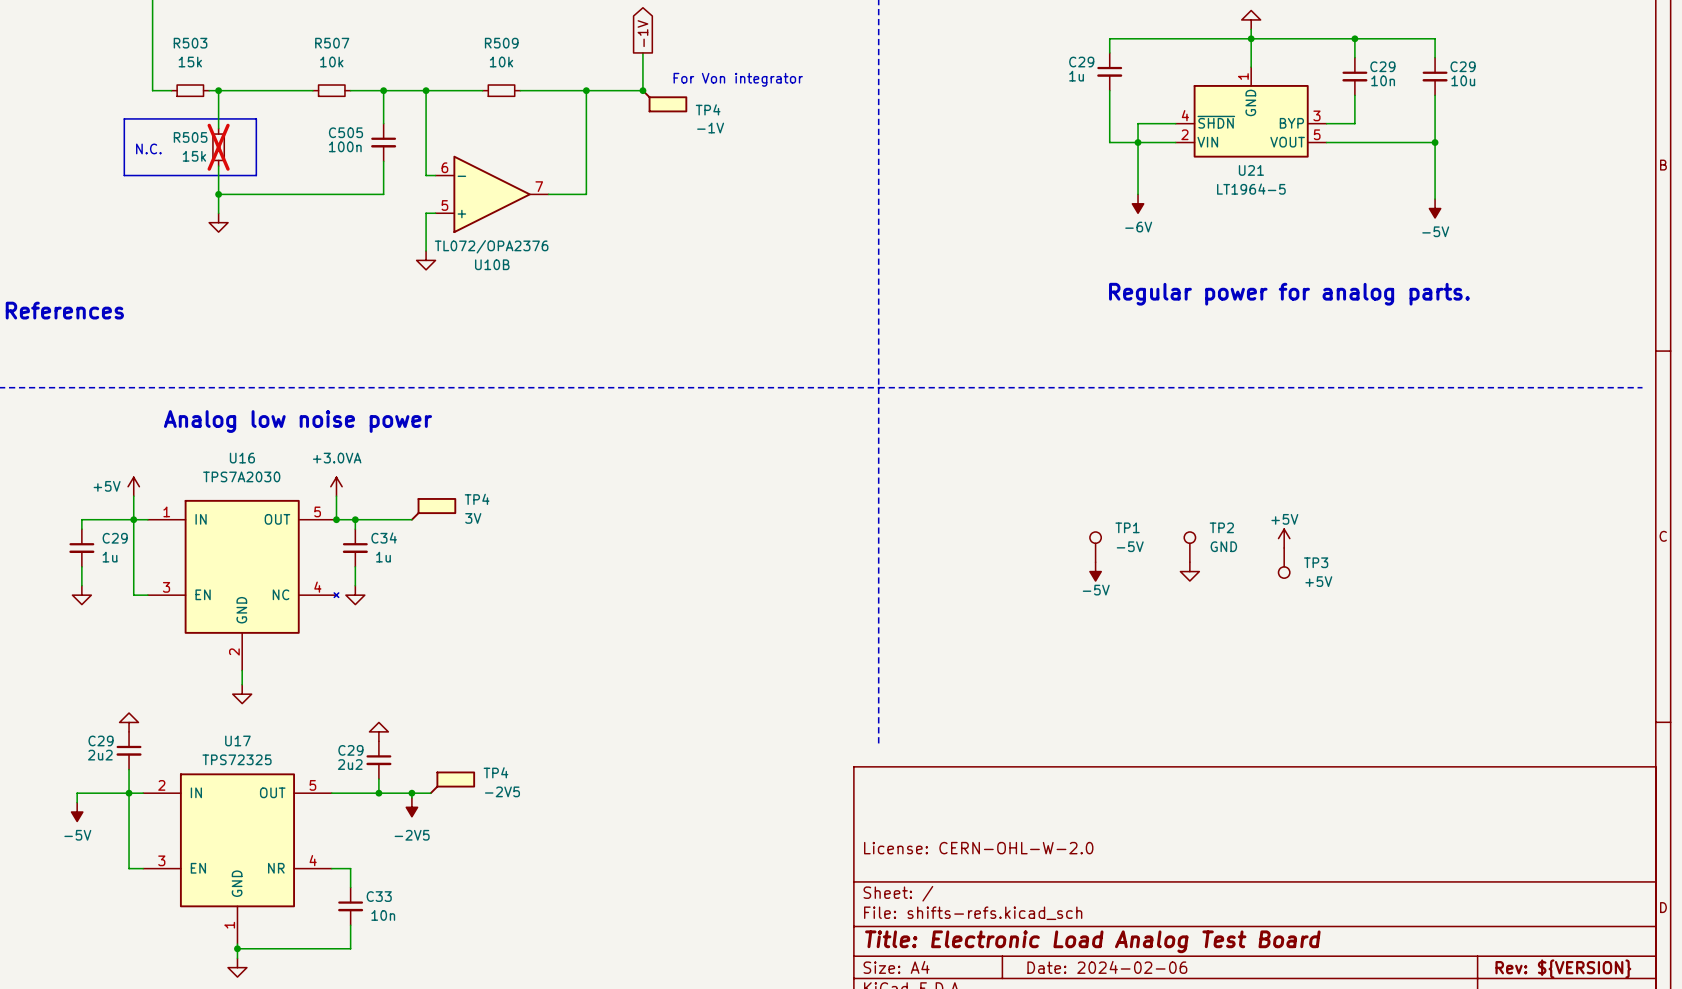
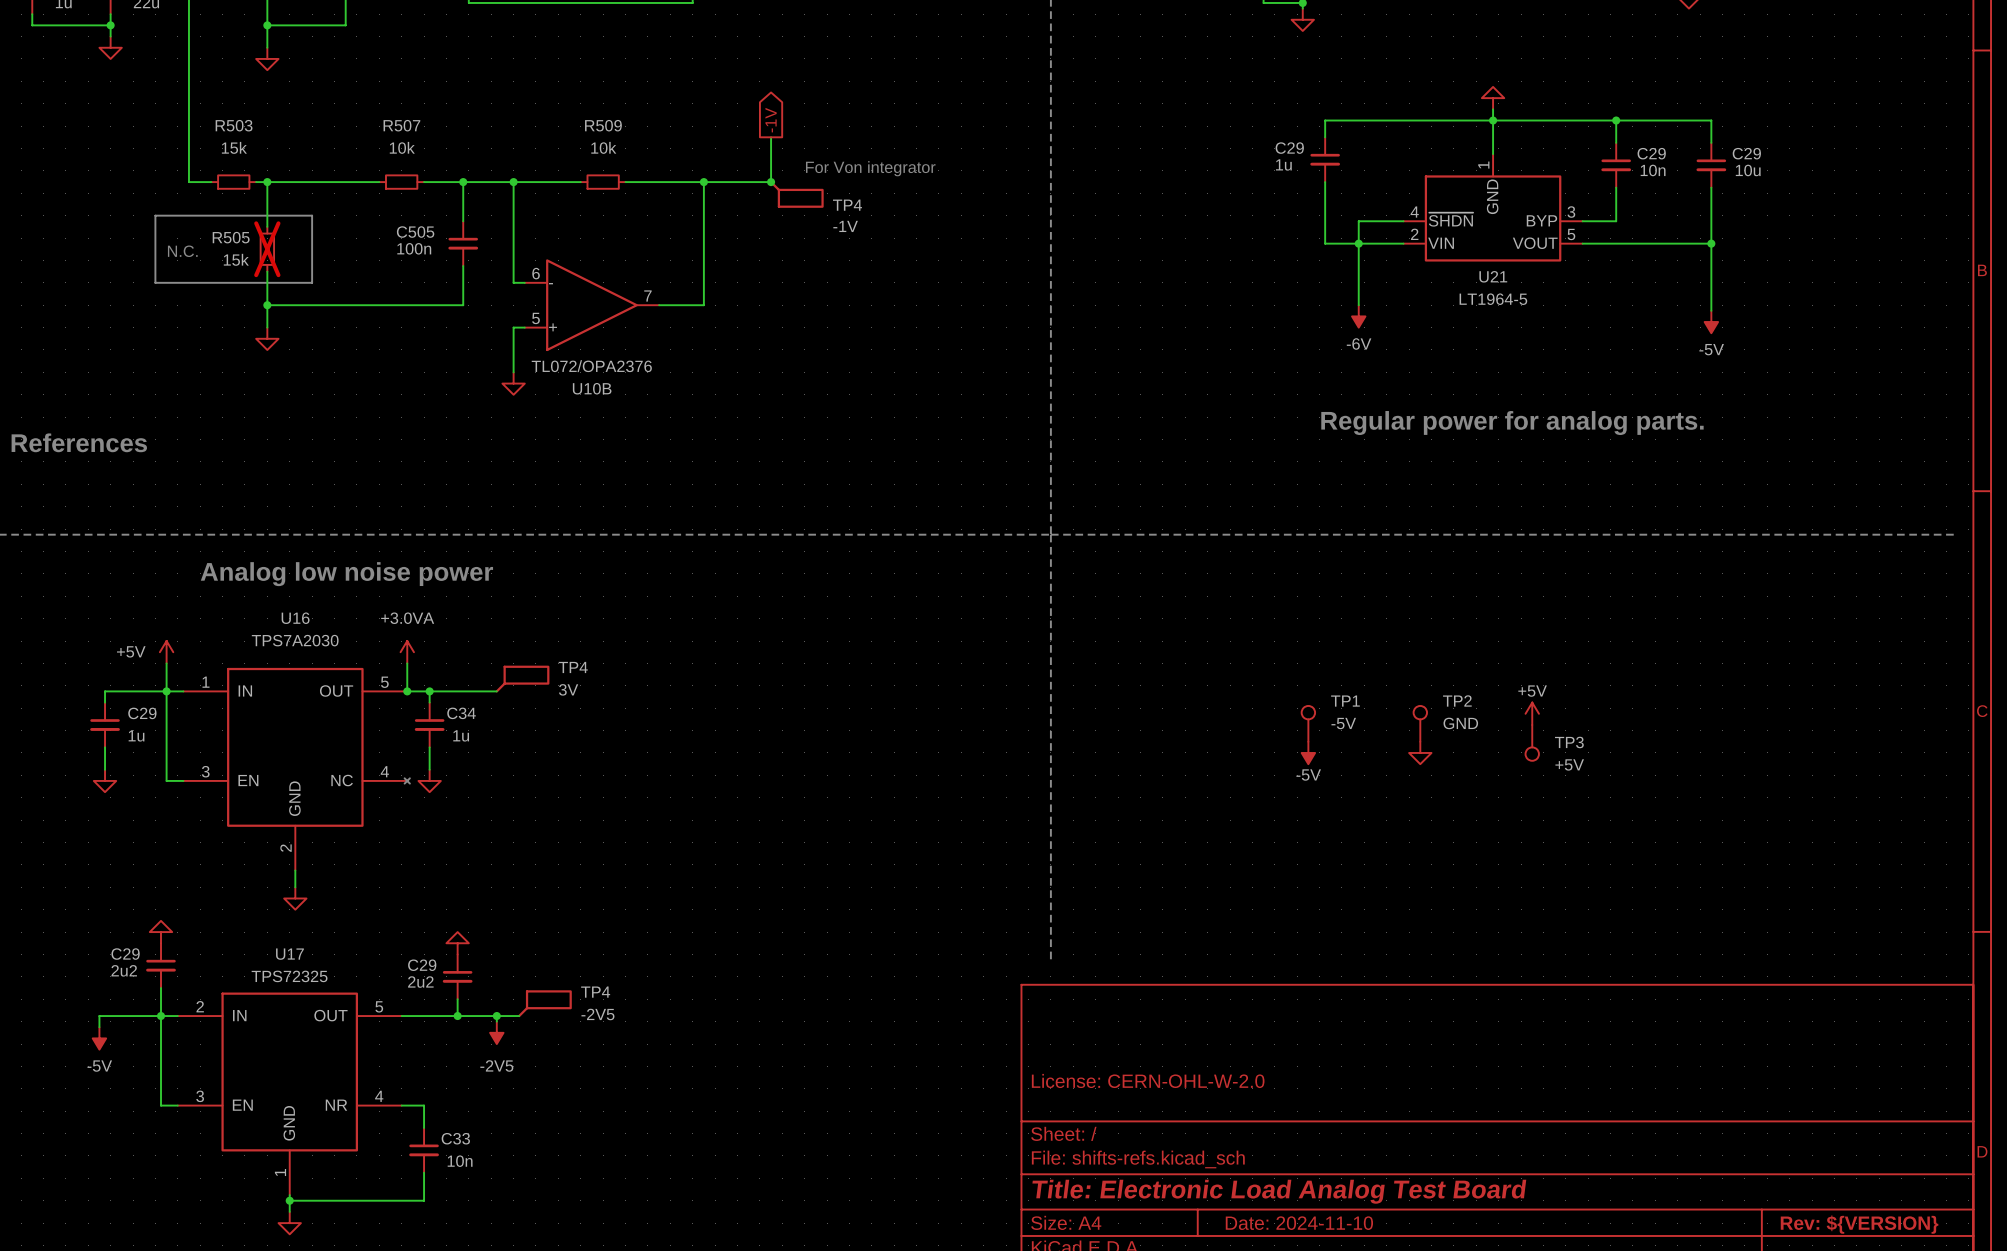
title block: Date: 2024-02-06 (1107, 967) -> Date: 2024-11-10 (1299, 1223)

